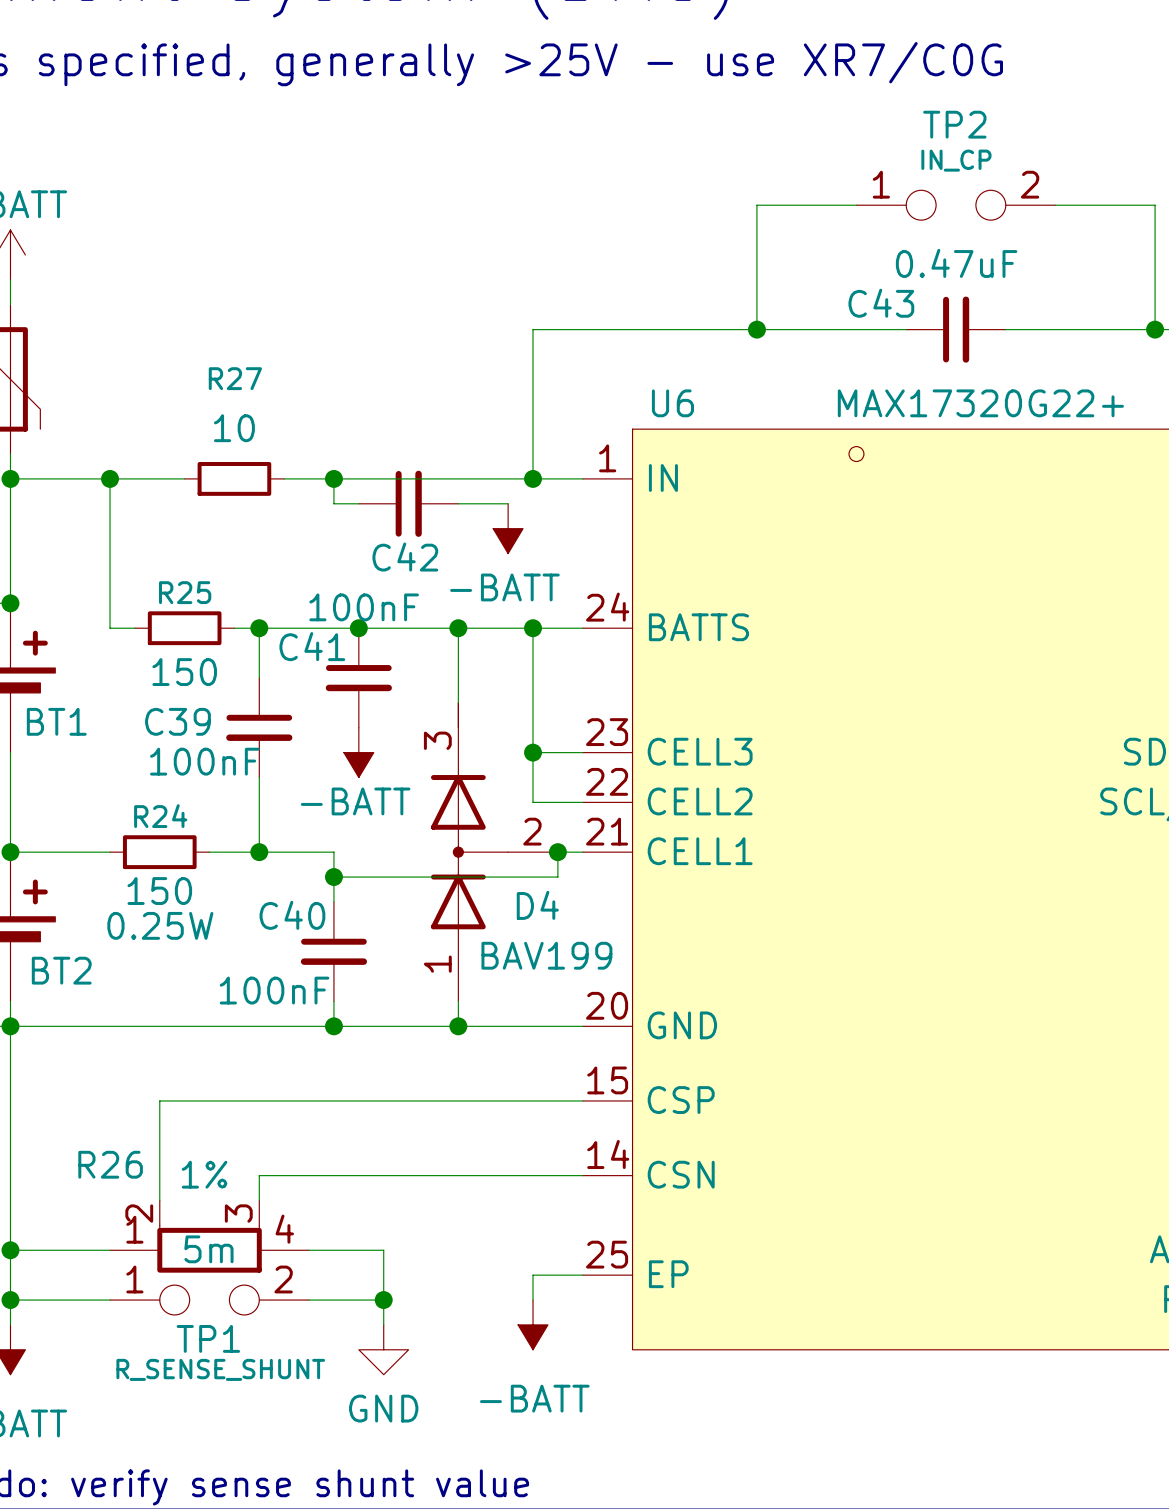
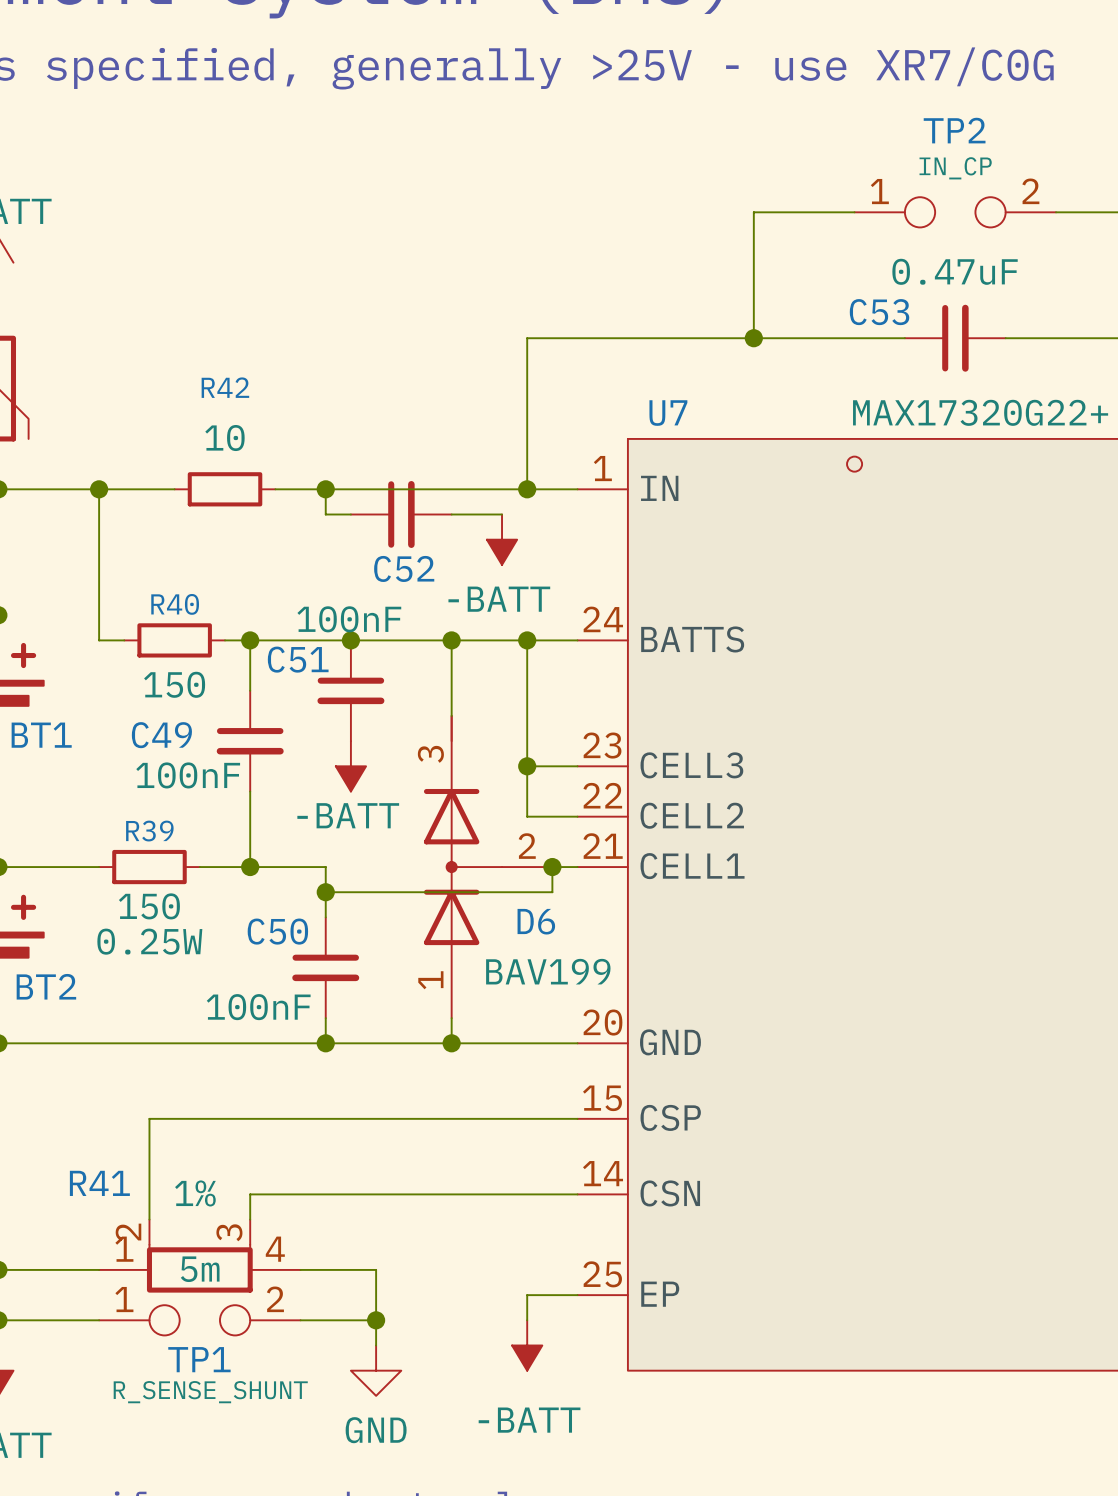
C43 name: C43 (881, 303) -> C53 (879, 312)
R27 name: R27 (235, 378) -> R42 (225, 387)
U6 name: U6 (672, 403) -> U7 (668, 413)
C42 name: C42 (405, 557) -> C52 (404, 568)
R25 name: R25 (185, 592) -> R40 (175, 604)
C41 name: C41 (312, 646) -> C51 (298, 659)
C39 name: C39 (177, 721) -> C49 (161, 735)
R24 name: R24 (160, 816) -> R39 (149, 831)
D4 name: D4 (537, 905) -> D6 (536, 921)
C40 name: C40 (292, 915) -> C50 (277, 931)
R26 name: R26 (110, 1164) -> R41 (99, 1183)

